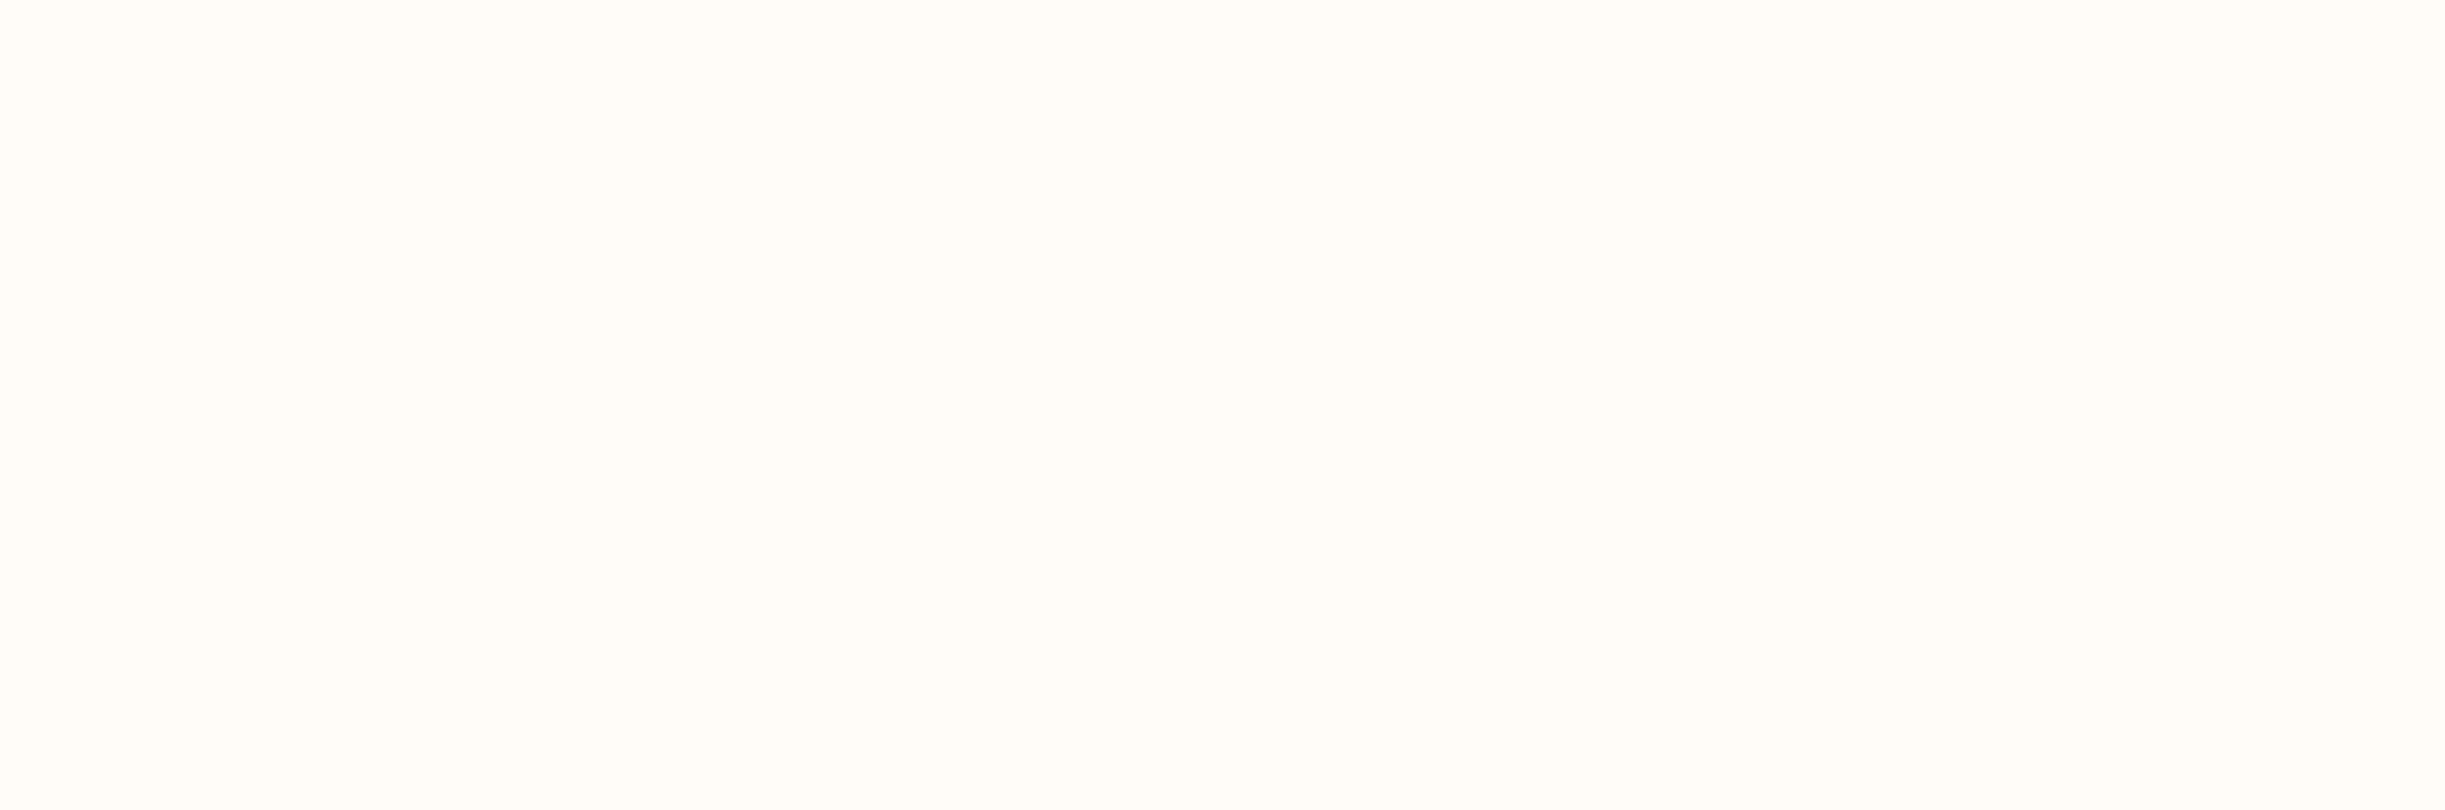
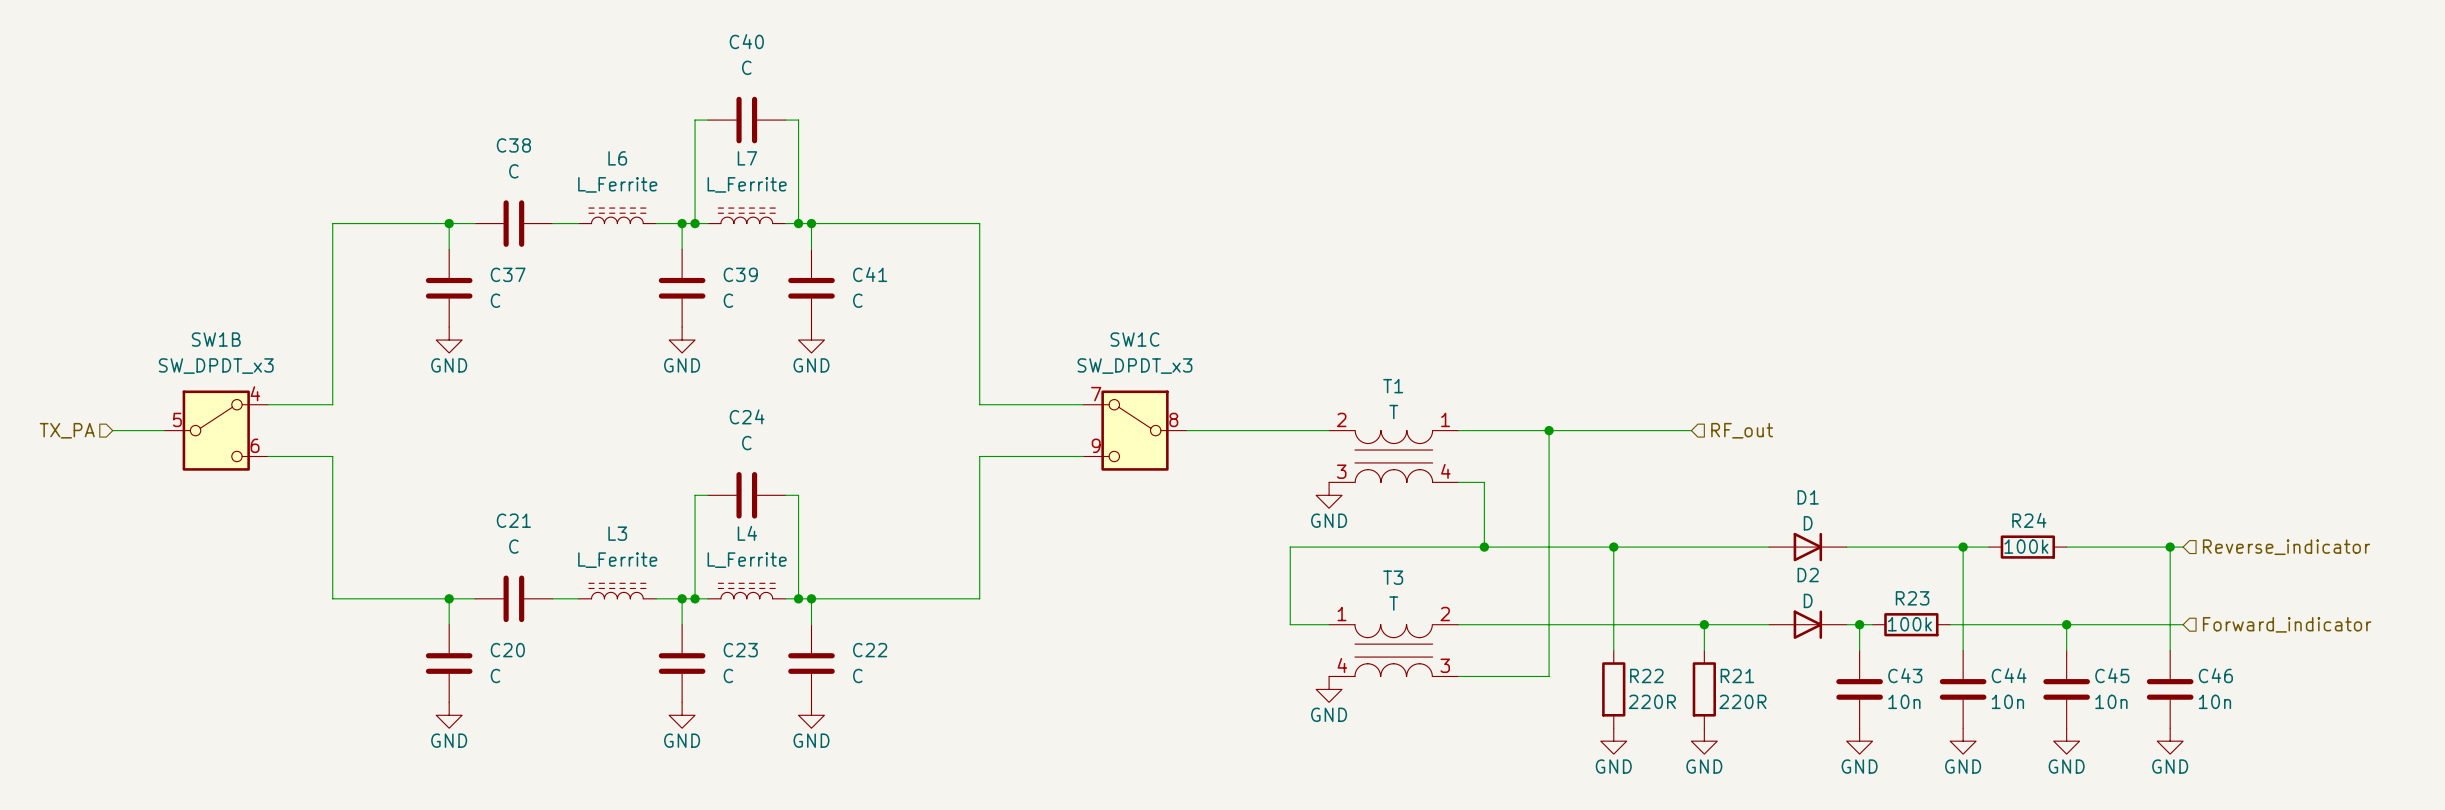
wire: none -> (707, 120) (695, 120) (695, 223)
C40: none -> C (746, 120)
wire: none -> (785, 120) (798, 120) (798, 223)
L6: none -> L_Ferrite (617, 215)
L7: none -> L_Ferrite (746, 215)
wire: none -> (449, 223) (449, 249)
junction: none -> (449, 223)
wire: none -> (475, 223) (332, 223) (332, 404) (268, 404)
C38: none -> C (513, 223)
wire: none -> (552, 223) (578, 223)
wire: none -> (656, 223) (707, 223)
wire: none -> (682, 223) (682, 249)
junction: none -> (682, 223)
junction: none -> (695, 223)
wire: none -> (785, 223) (979, 223) (979, 404) (1083, 404)
junction: none -> (798, 223)
wire: none -> (811, 223) (811, 249)
junction: none -> (811, 223)
C37: none -> C (449, 288)
C39: none -> C (682, 288)
C41: none -> C (811, 288)
power symbol: none -> GND (449, 340)
power symbol: none -> GND (682, 340)
power symbol: none -> GND (811, 340)
wire: none -> (112, 430) (164, 430)
SW1B: none -> SW_DPDT_x3 (216, 430)
SW1C: none -> SW_DPDT_x3 (1134, 430)
wire: none -> (1186, 430) (1329, 430)
wire: none -> (1458, 430) (1691, 430)
wire: none -> (1549, 430) (1549, 676) (1458, 676)
junction: none -> (1549, 430)
hierarchical label: none -> TX_PA (67, 430)
hierarchical label: none -> RF_out (1742, 430)
wire: none -> (268, 456) (332, 456) (332, 598) (475, 598)
wire: none -> (1083, 456) (979, 456) (979, 598) (785, 598)
T1: none -> T (1393, 456)
wire: none -> (1458, 482) (1484, 482) (1484, 547)
wire: none -> (707, 495) (695, 495) (695, 598)
C24: none -> C (746, 495)
wire: none -> (785, 495) (798, 495) (798, 598)
power symbol: none -> GND (1329, 495)
junction: none -> (1484, 547)
wire: none -> (1613, 547) (1613, 650)
junction: none -> (1613, 547)
wire: none -> (1769, 547) (1290, 547) (1290, 624) (1329, 624)
D1: none -> D (1807, 547)
wire: none -> (1846, 547) (1989, 547)
wire: none -> (1963, 547) (1963, 650)
junction: none -> (1963, 547)
R24: none -> 100k (2027, 547)
wire: none -> (2066, 547) (2183, 547)
wire: none -> (2170, 547) (2170, 650)
junction: none -> (2170, 547)
hierarchical label: none -> Reverse_indicator (2286, 547)
L3: none -> L_Ferrite (617, 591)
L4: none -> L_Ferrite (746, 591)
wire: none -> (449, 598) (449, 624)
junction: none -> (449, 598)
C21: none -> C (513, 598)
wire: none -> (552, 598) (578, 598)
wire: none -> (656, 598) (707, 598)
wire: none -> (682, 598) (682, 624)
junction: none -> (682, 598)
junction: none -> (695, 598)
junction: none -> (798, 598)
wire: none -> (811, 598) (811, 624)
junction: none -> (811, 598)
wire: none -> (1458, 624) (1769, 624)
wire: none -> (1704, 624) (1704, 650)
junction: none -> (1704, 624)
D2: none -> D (1807, 624)
wire: none -> (1846, 624) (1872, 624)
wire: none -> (1859, 624) (1859, 650)
junction: none -> (1859, 624)
R23: none -> 100k (1911, 624)
wire: none -> (1950, 624) (2183, 624)
wire: none -> (2066, 624) (2066, 650)
junction: none -> (2066, 624)
hierarchical label: none -> Forward_indicator (2287, 624)
T3: none -> T (1393, 650)
C20: none -> C (449, 663)
C23: none -> C (682, 663)
C22: none -> C (811, 663)
power symbol: none -> GND (1329, 689)
R22: none -> 220R (1613, 689)
R21: none -> 220R (1704, 689)
C43: none -> 10n (1859, 689)
C44: none -> 10n (1963, 689)
C45: none -> 10n (2066, 689)
C46: none -> 10n (2170, 689)
power symbol: none -> GND (449, 715)
power symbol: none -> GND (682, 715)
power symbol: none -> GND (811, 715)
power symbol: none -> GND (1613, 741)
power symbol: none -> GND (1704, 741)
power symbol: none -> GND (1859, 741)
power symbol: none -> GND (1963, 741)
power symbol: none -> GND (2066, 741)
power symbol: none -> GND (2170, 741)

